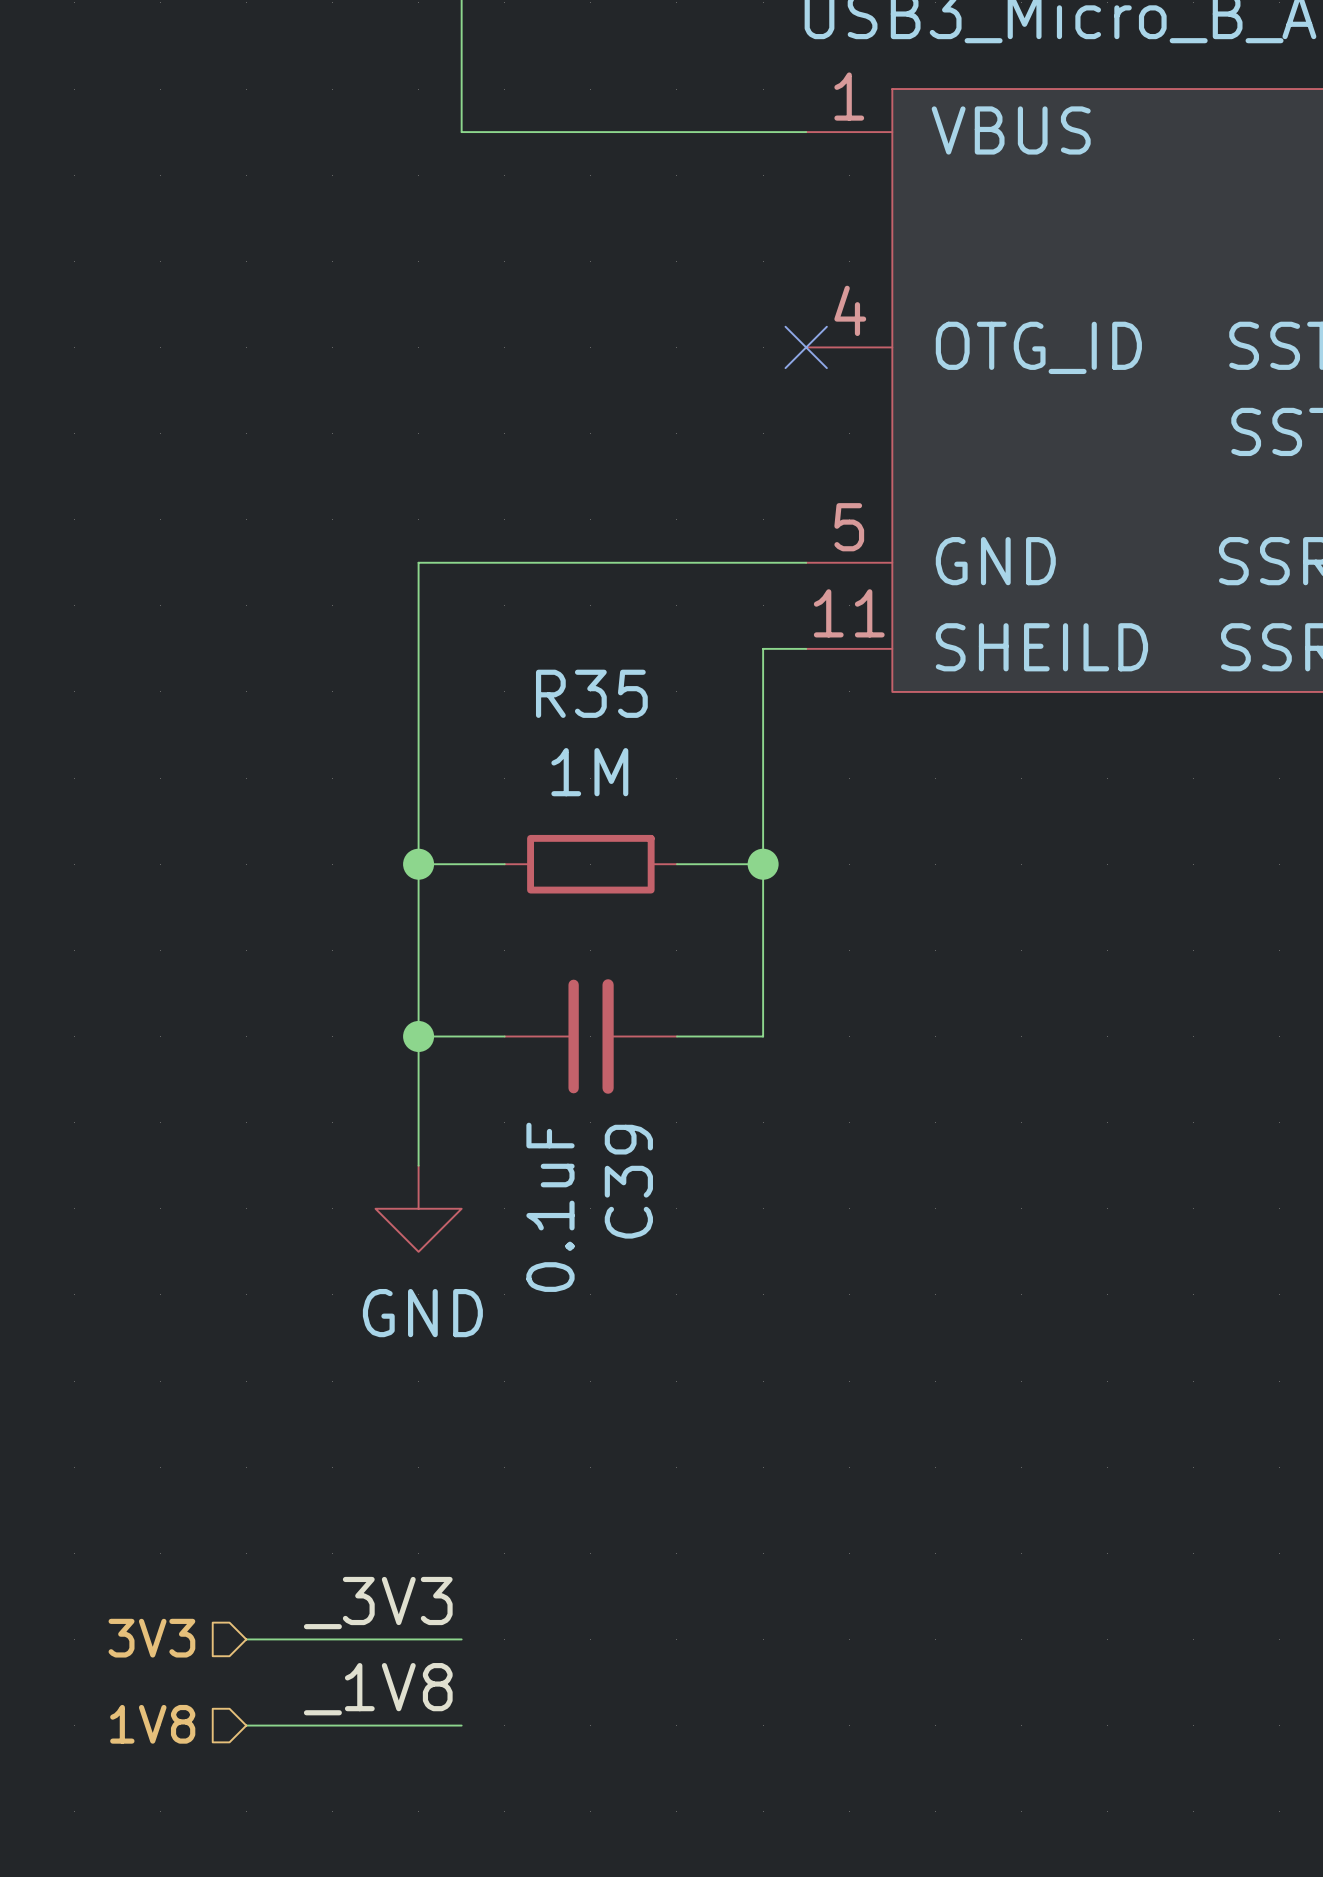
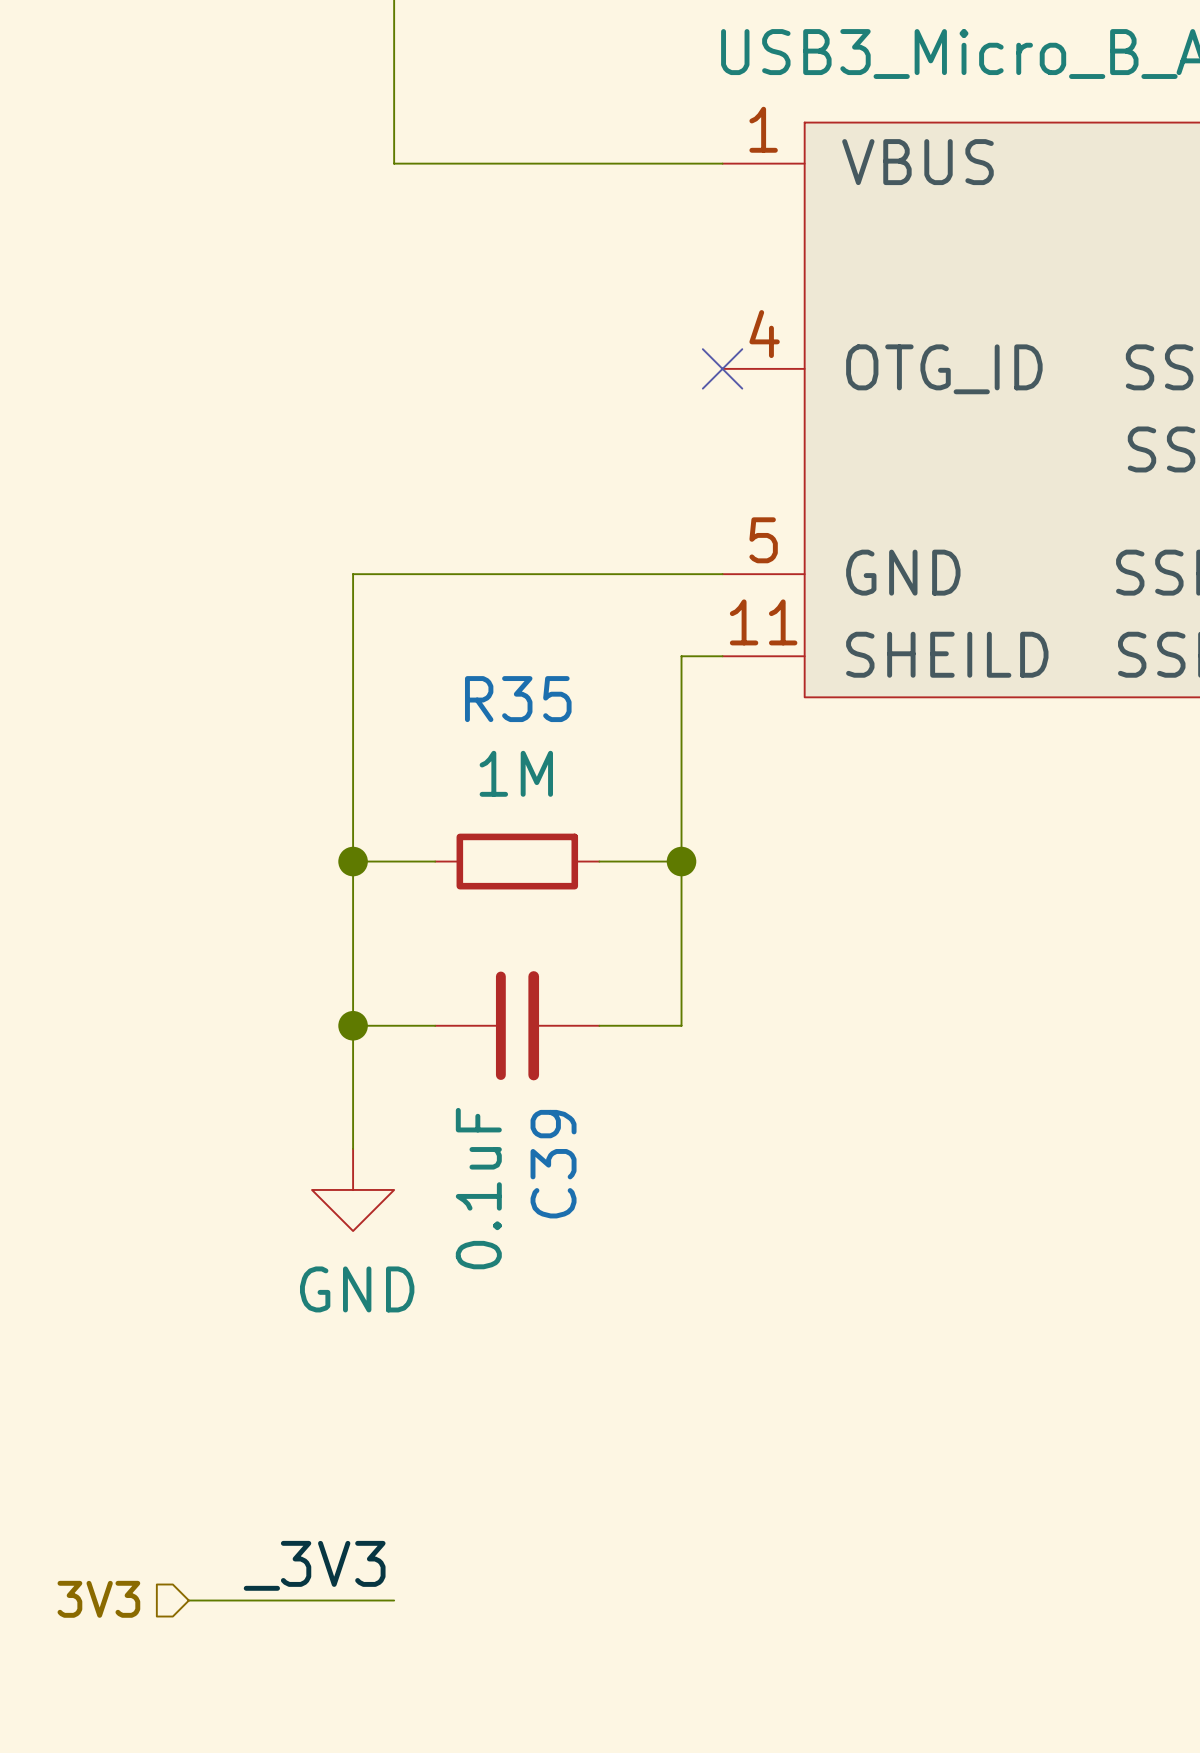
label: _1V8 (378, 1689) -> none
hierarchical label: 1V8 (152, 1724) -> none
wire: (246, 1725) (461, 1725) -> none

